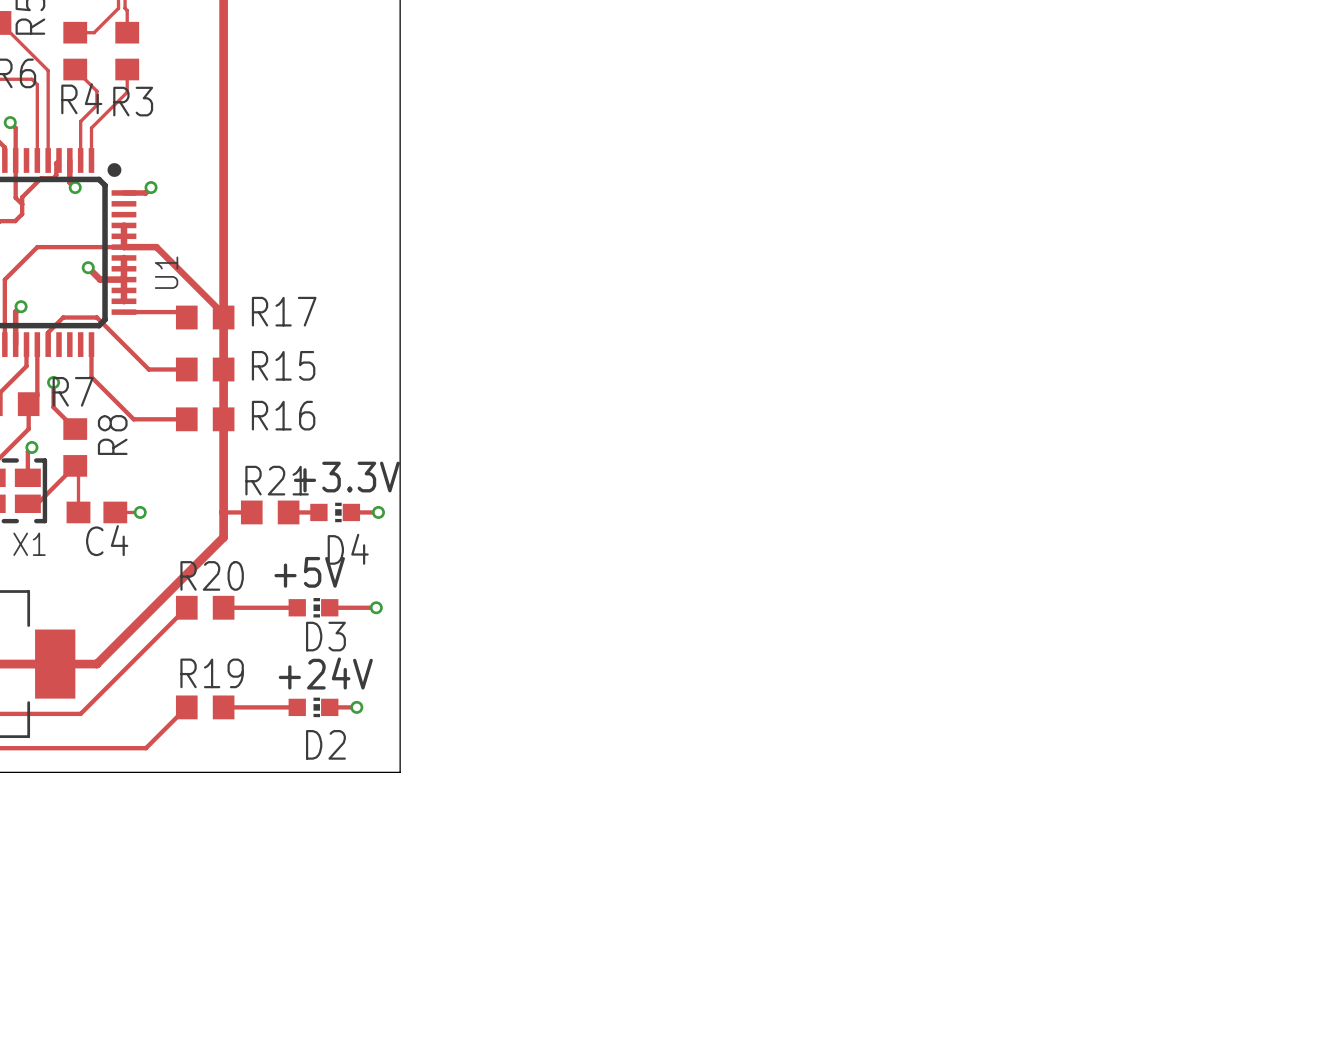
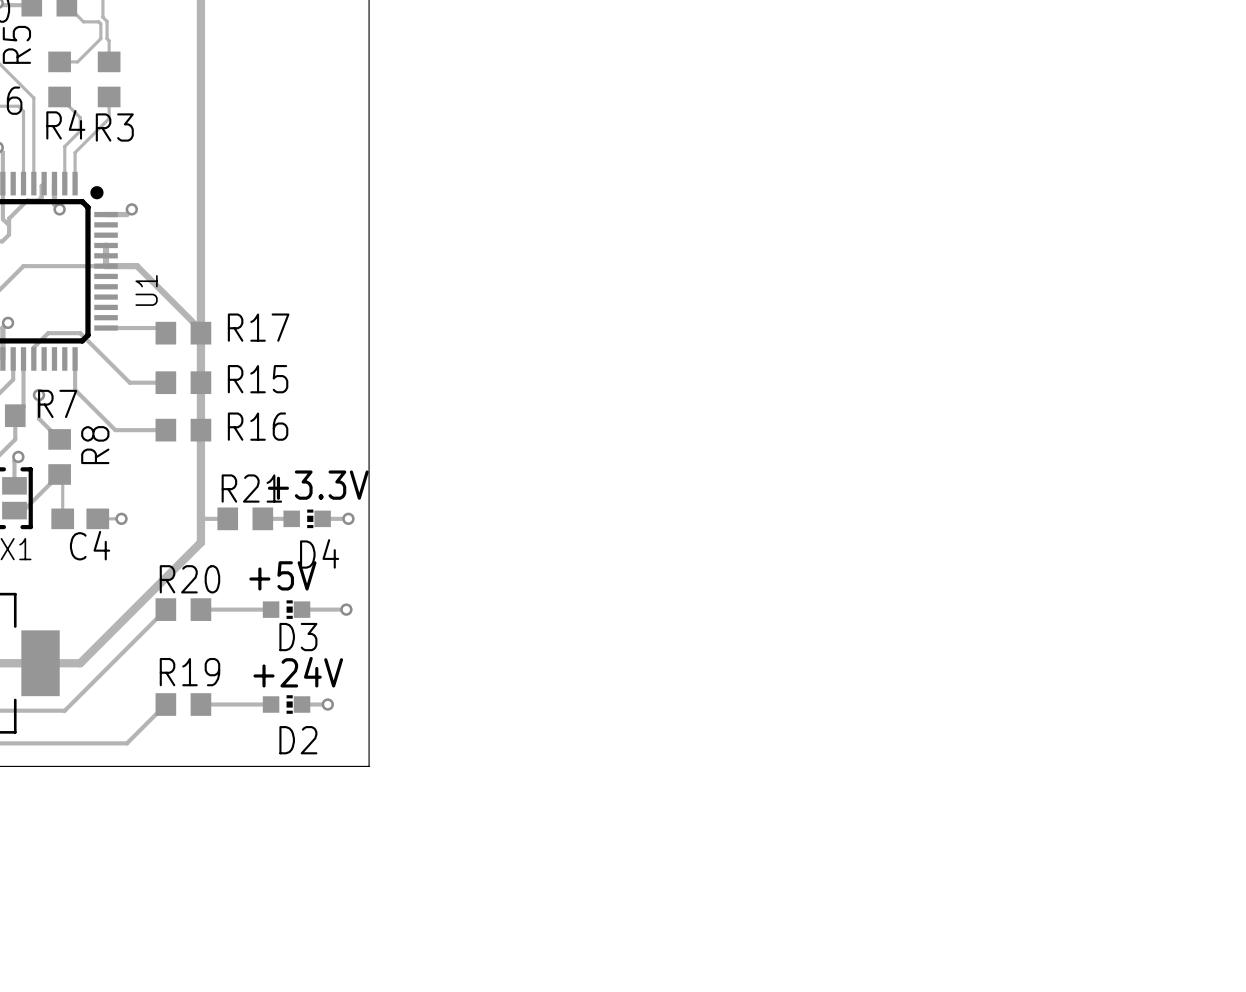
track: (123, 257) (123, 301) -> none
track: (88, 267) (100, 279) (123, 279) -> none
via: (88, 267) -> none

